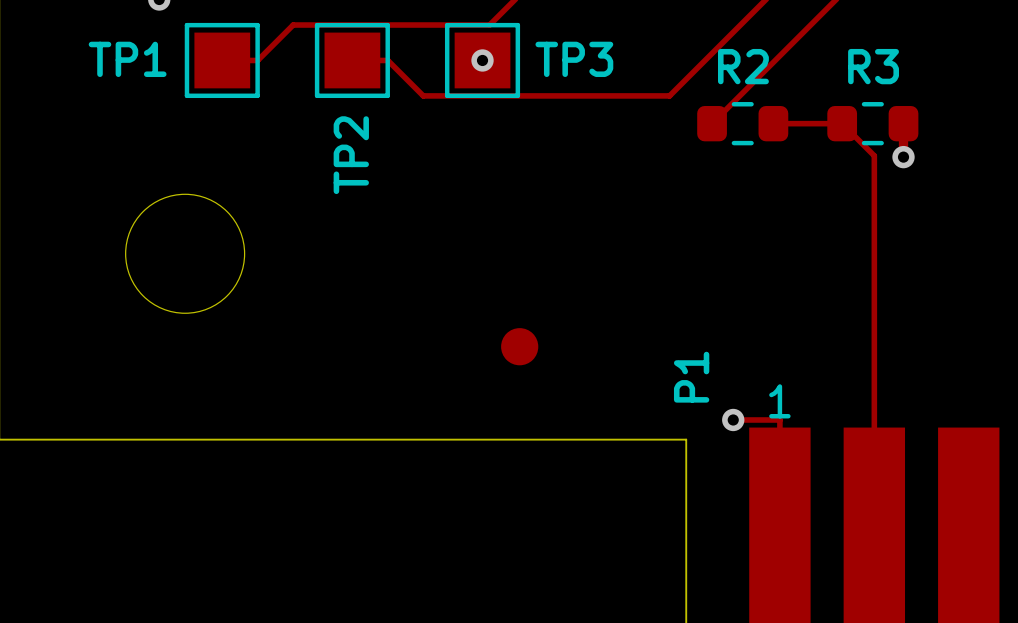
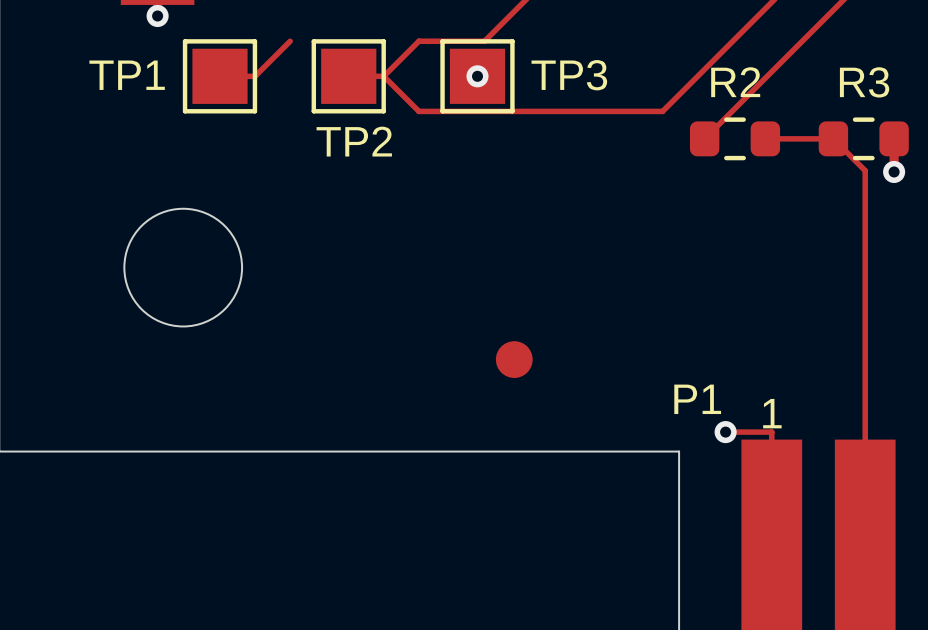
track: (293, 25) (423, 25) -> (383, 76) (418, 41)
TP2 name rotation: 0° (351, 155) -> 90° clockwise (354, 141)
P1 name rotation: 0° (691, 377) -> 90° clockwise (697, 399)

